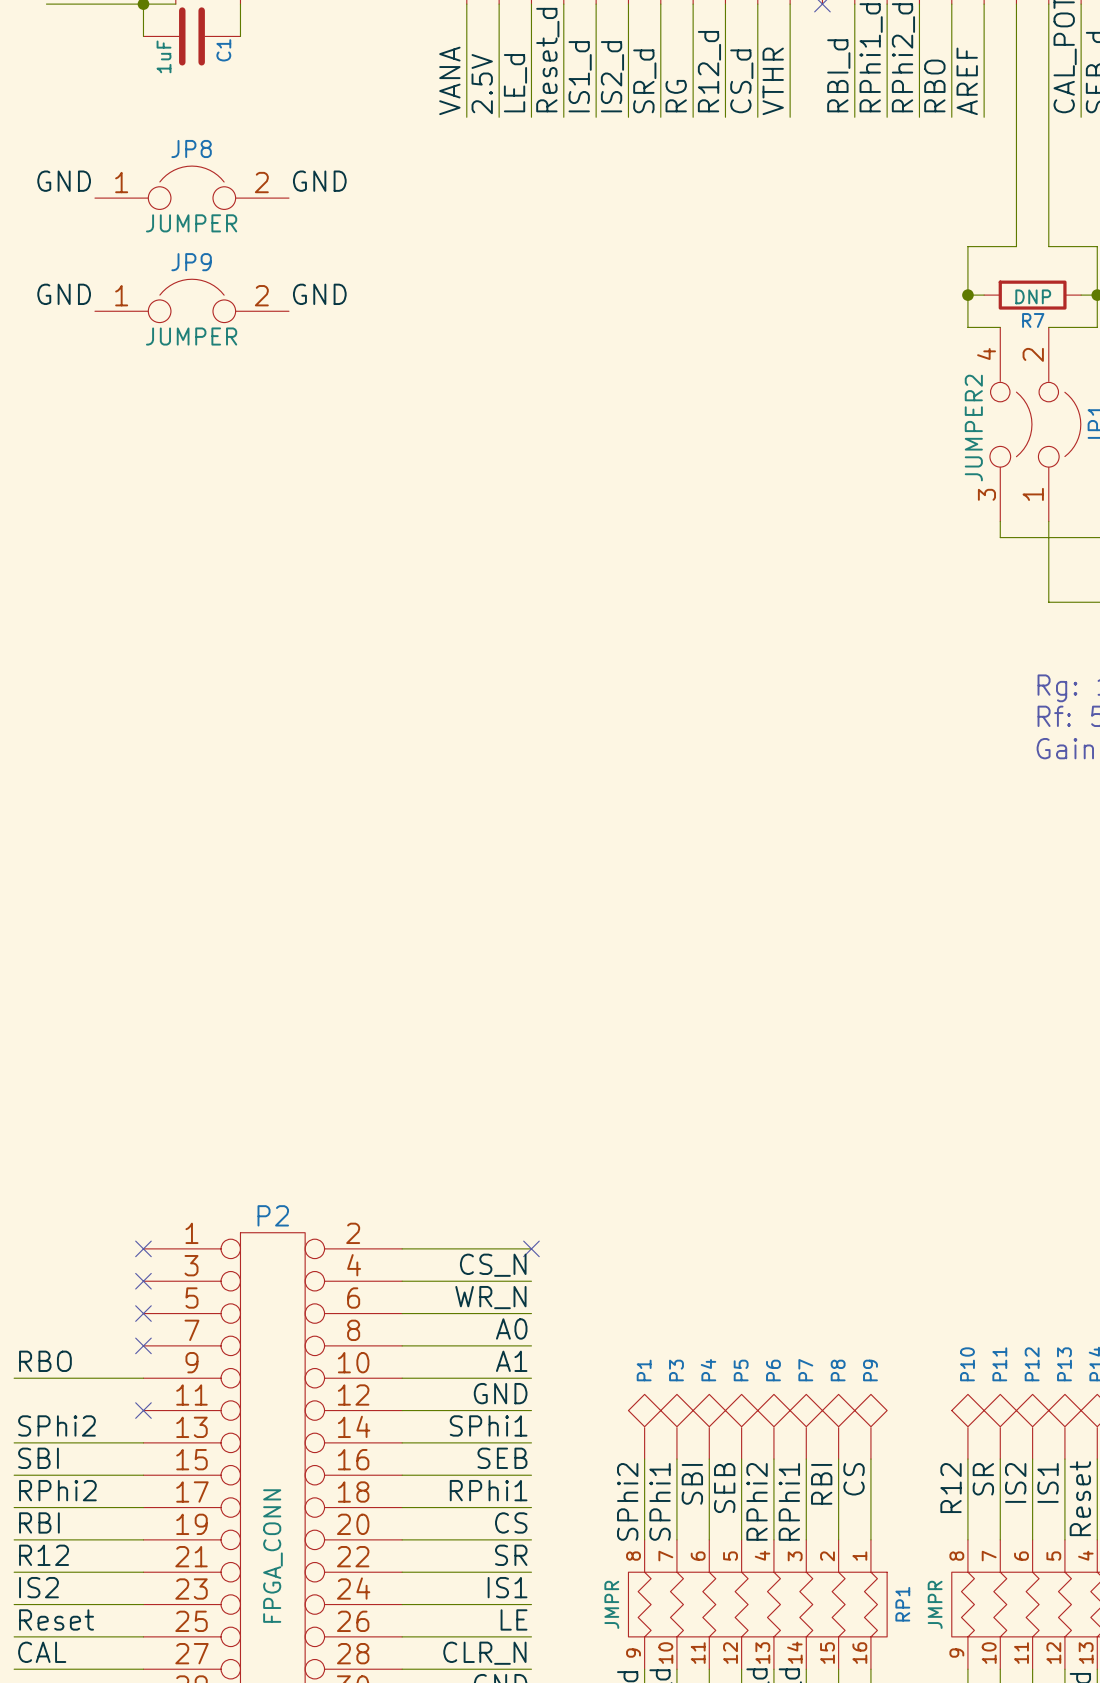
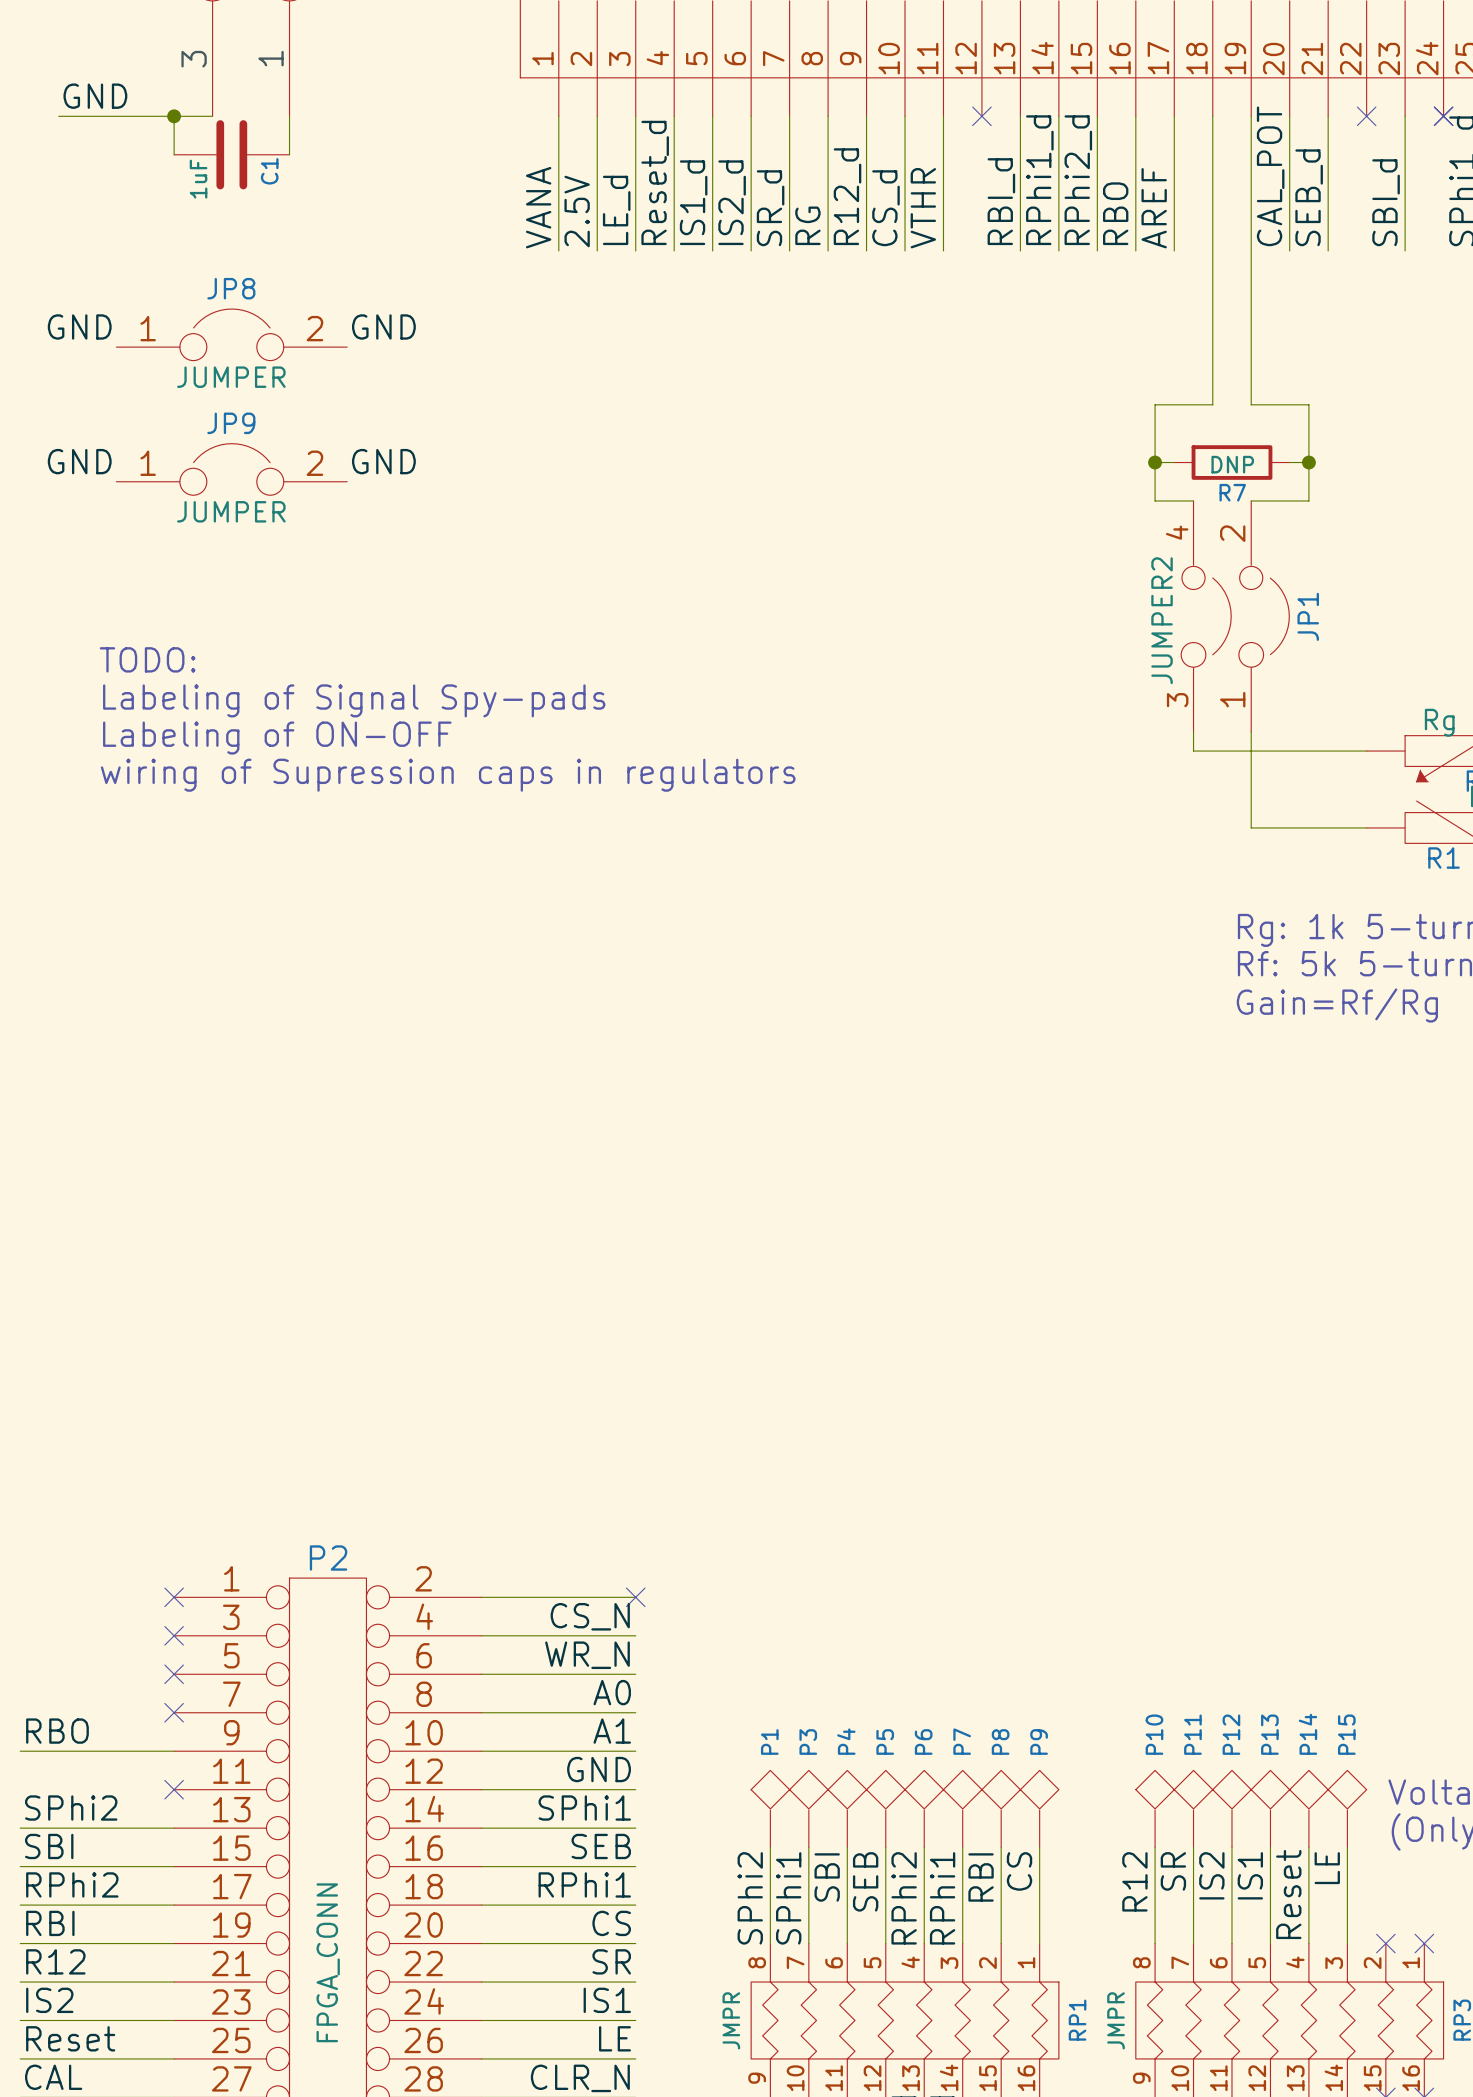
text: none -> TODO: (147, 659)
text: none -> Labeling of Signal Spy-pads (354, 700)
text: none -> Labeling of ON-OFF (277, 738)
text: none -> wiring of Supression caps in regulators (448, 775)

